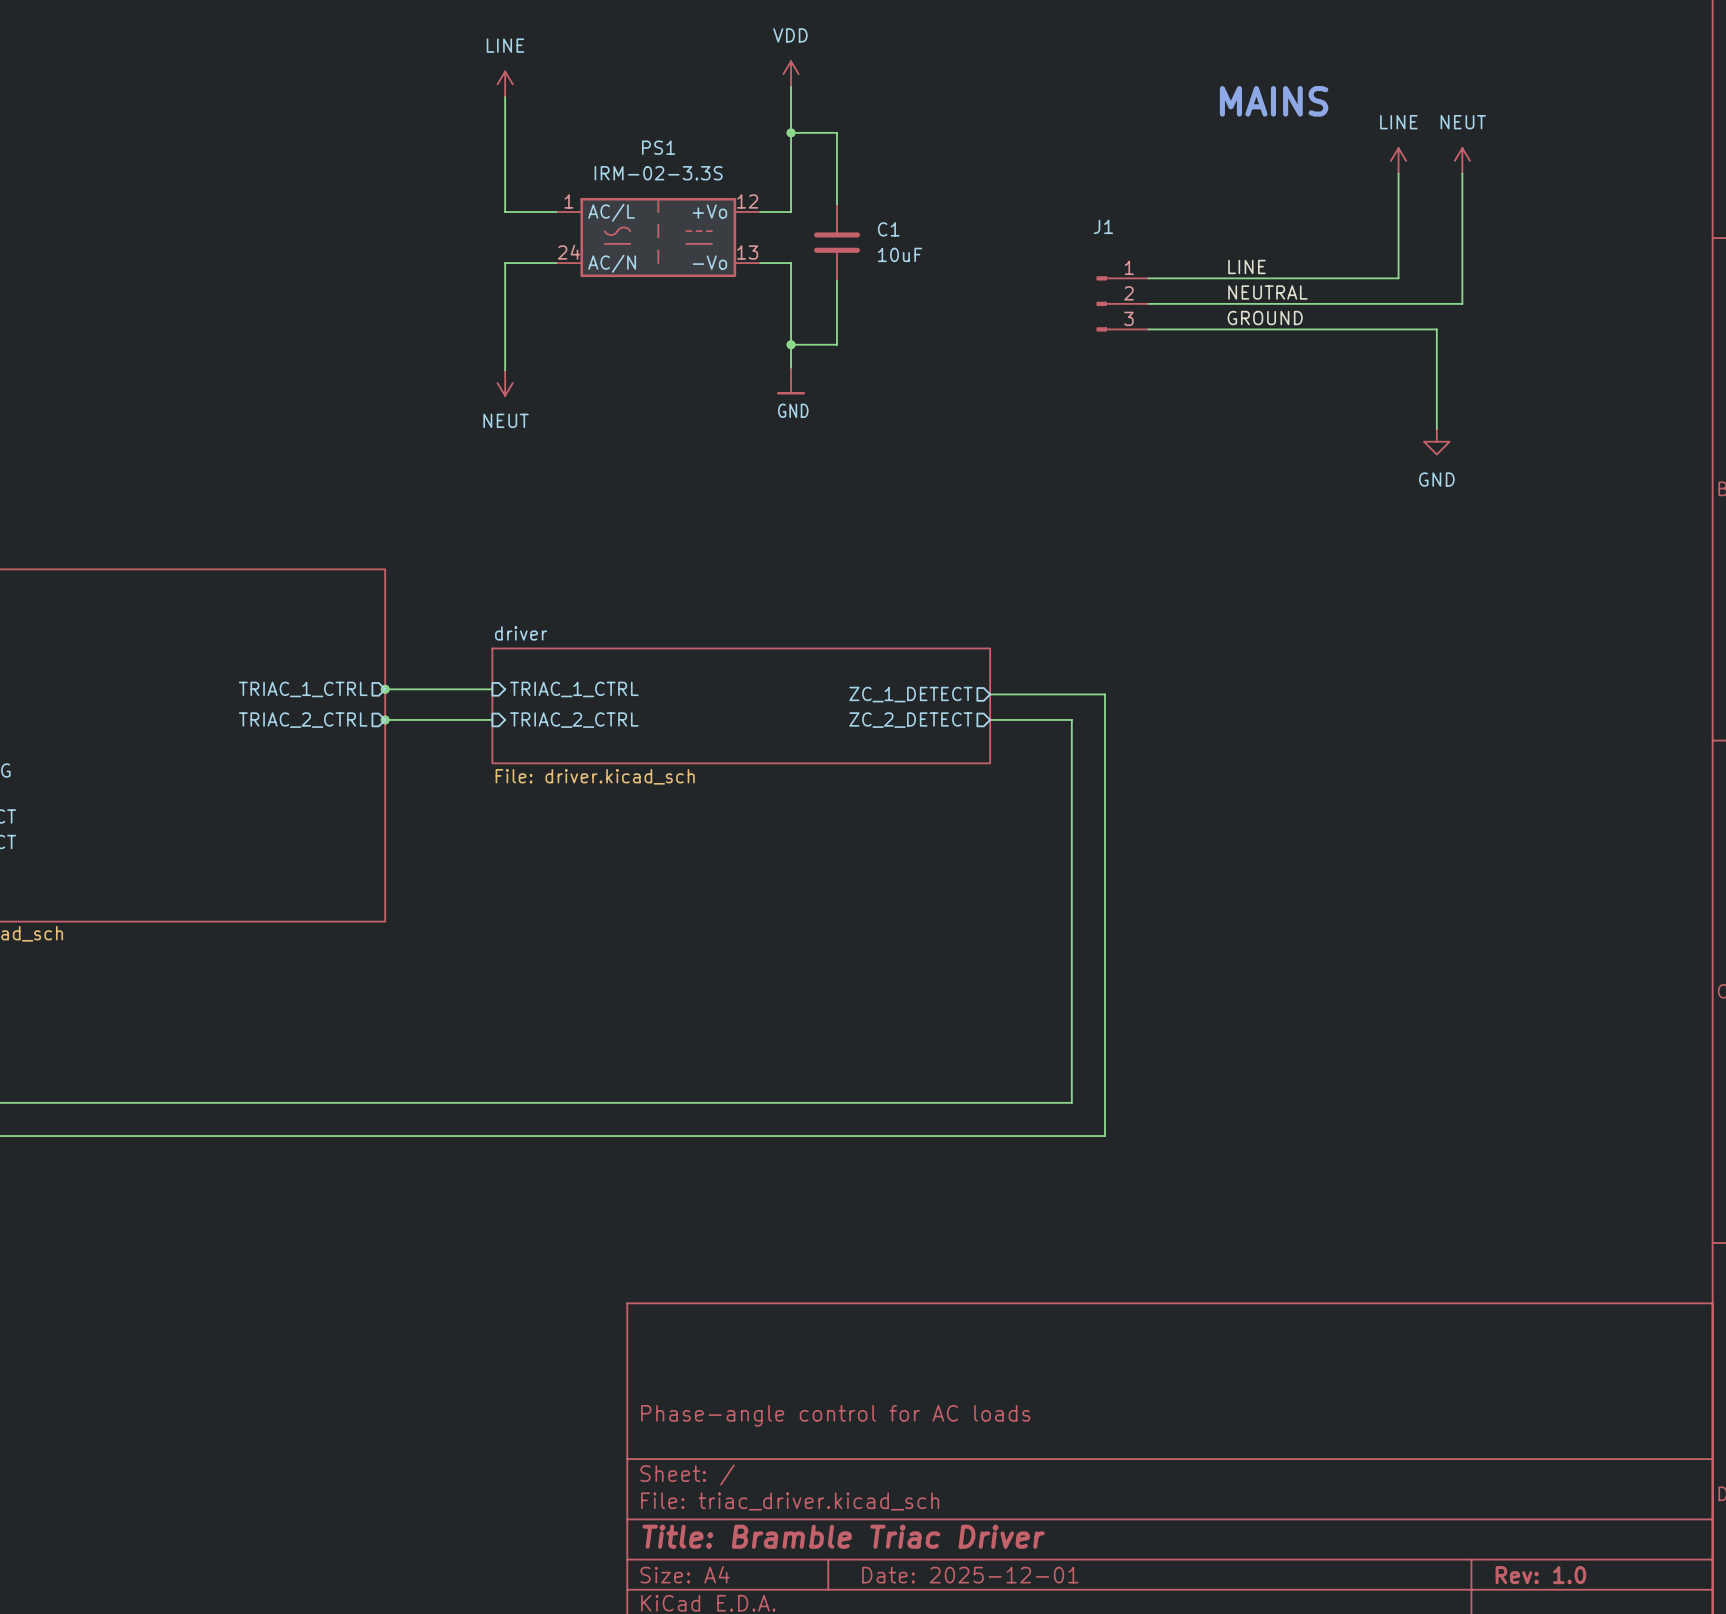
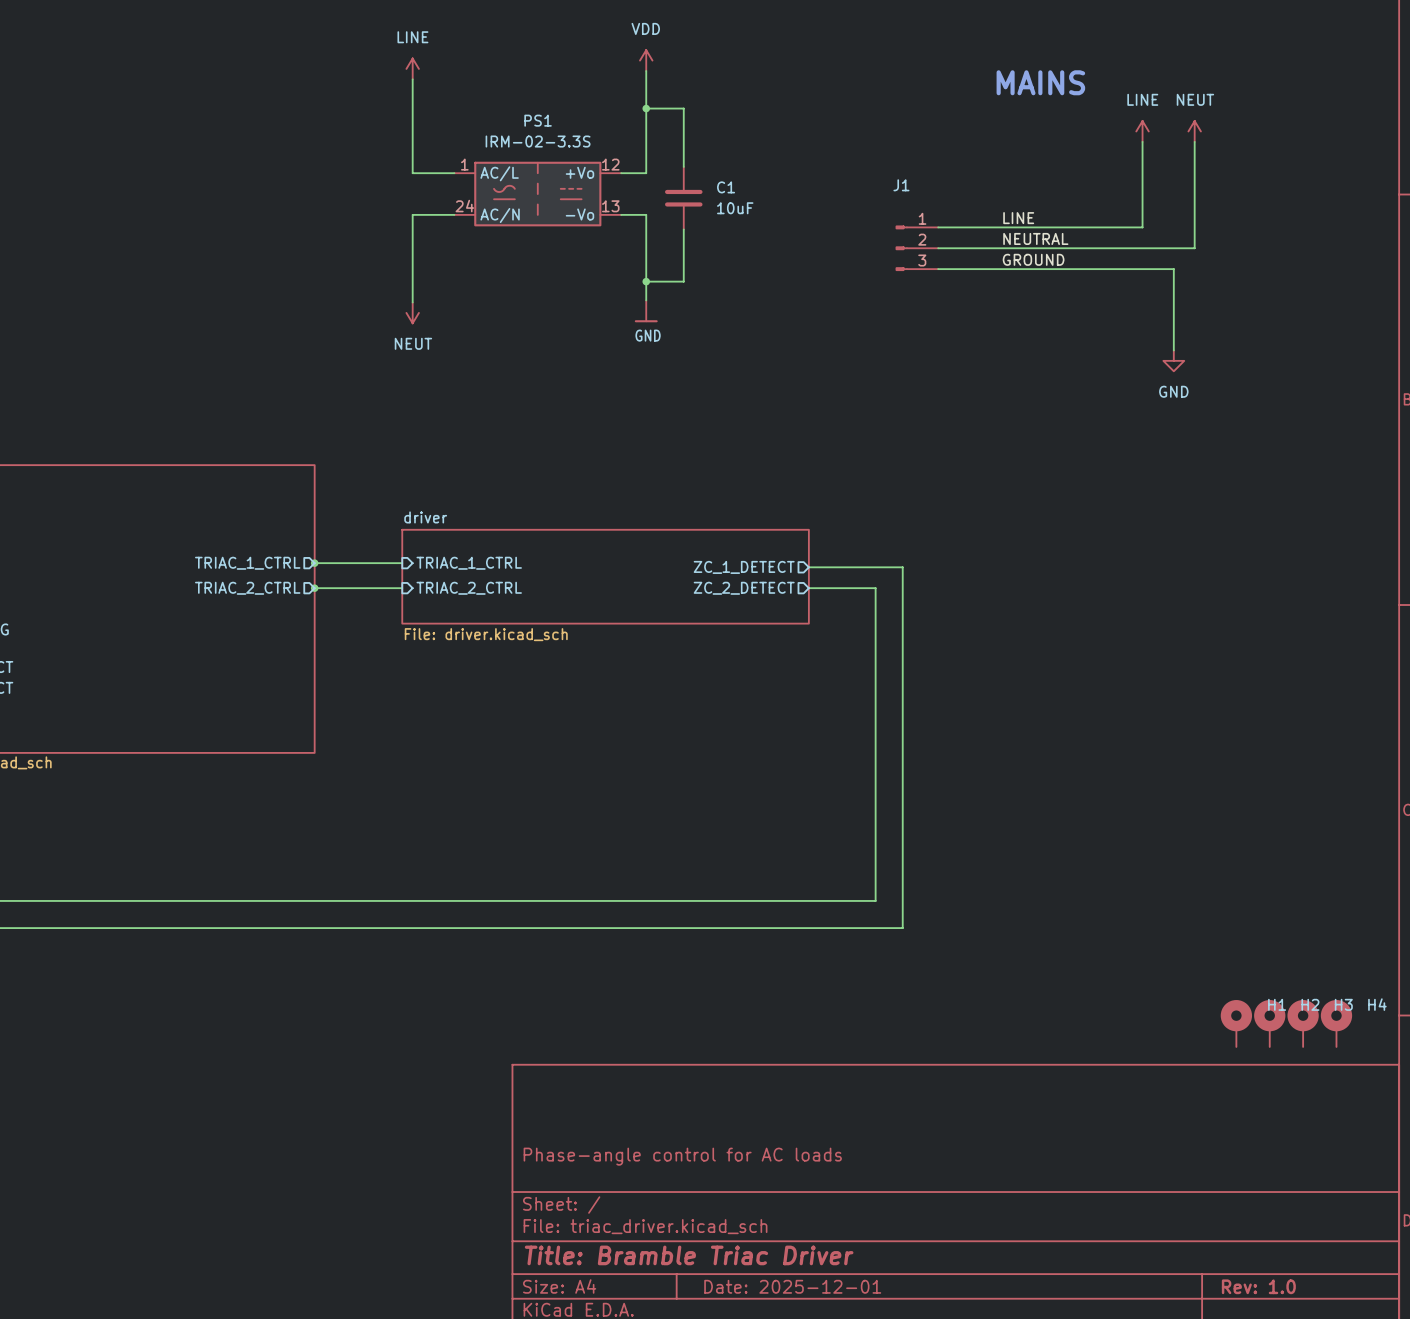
H1: none -> (1236, 1023)
H2: none -> (1269, 1023)
H3: none -> (1303, 1023)
H4: none -> (1336, 1023)

